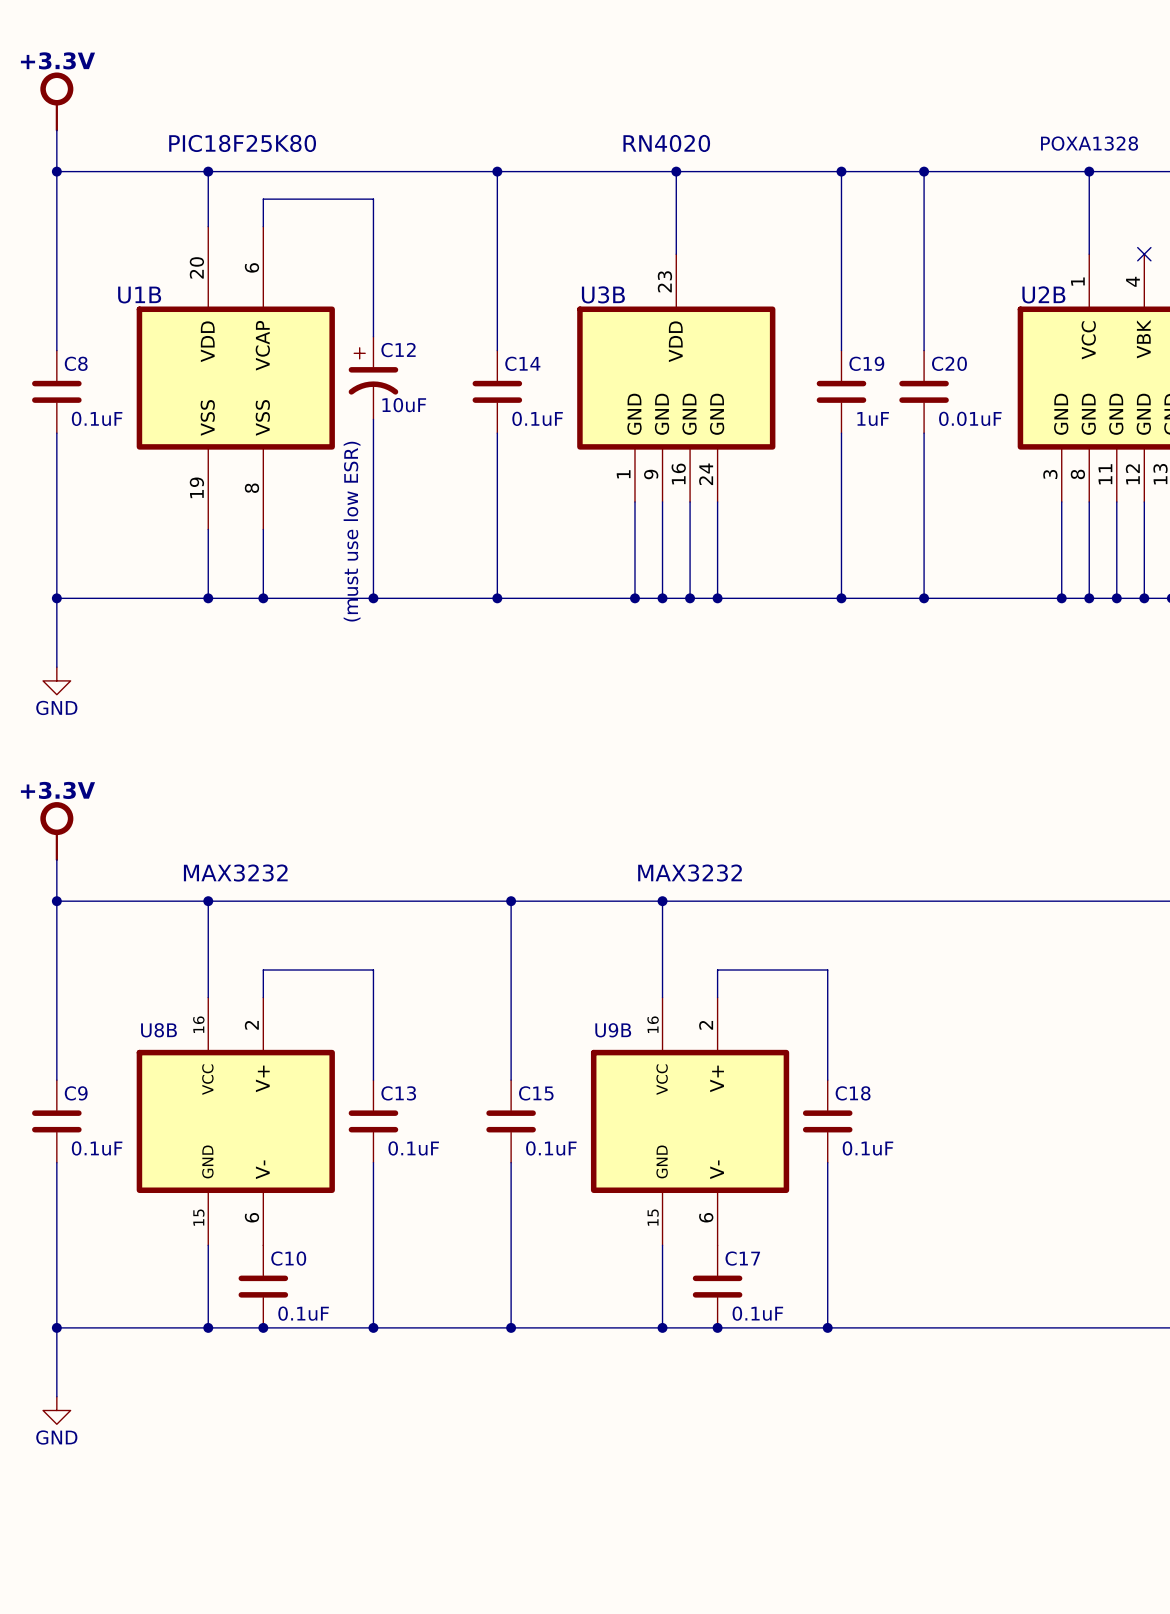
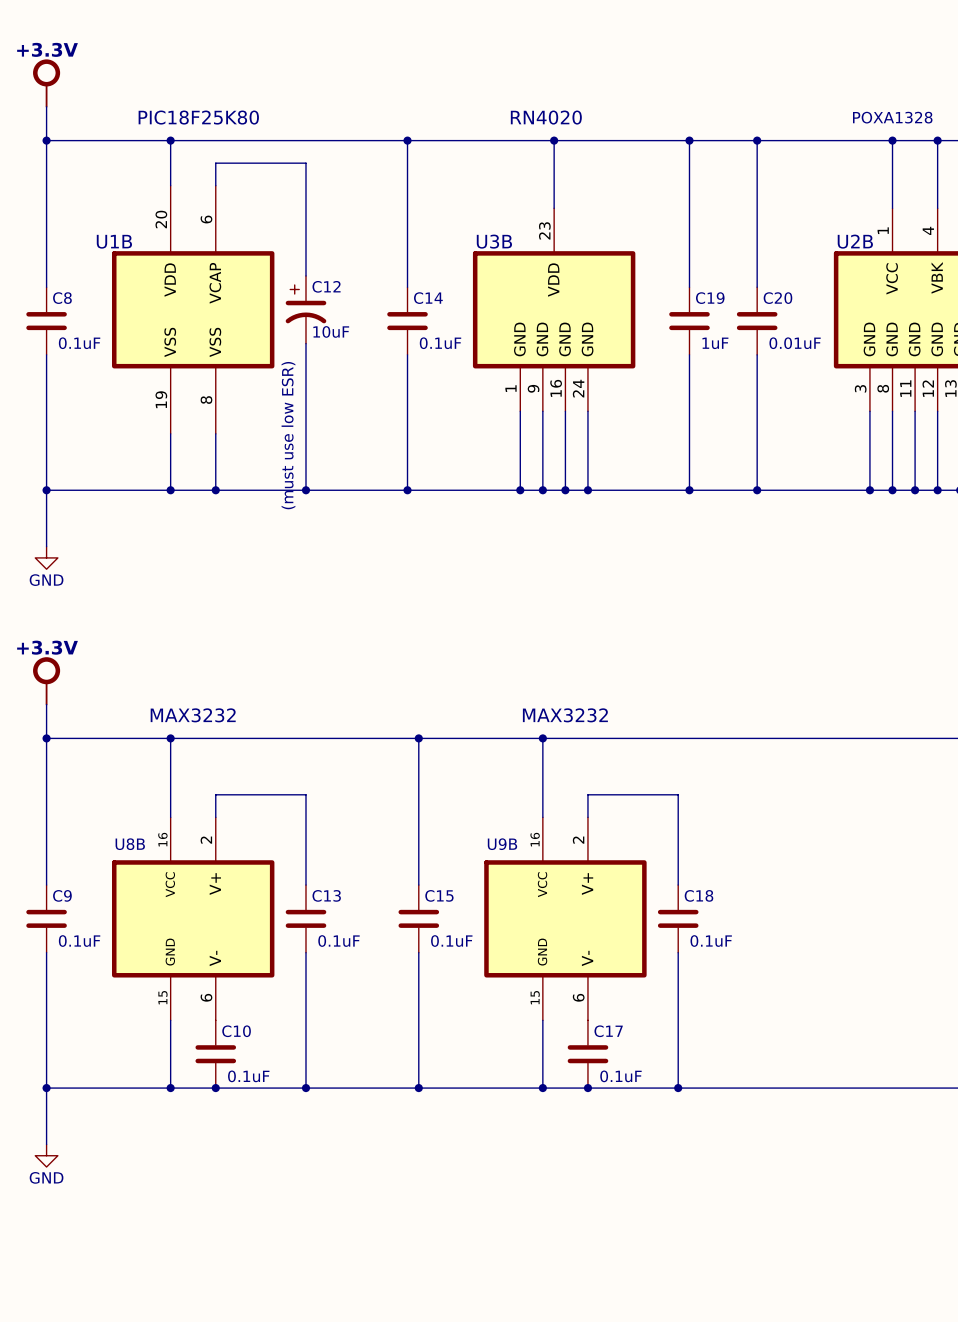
wire: none -> (937, 140) (937, 208)
junction: none -> (937, 140)
no-connect mark: (1144, 254) -> none

